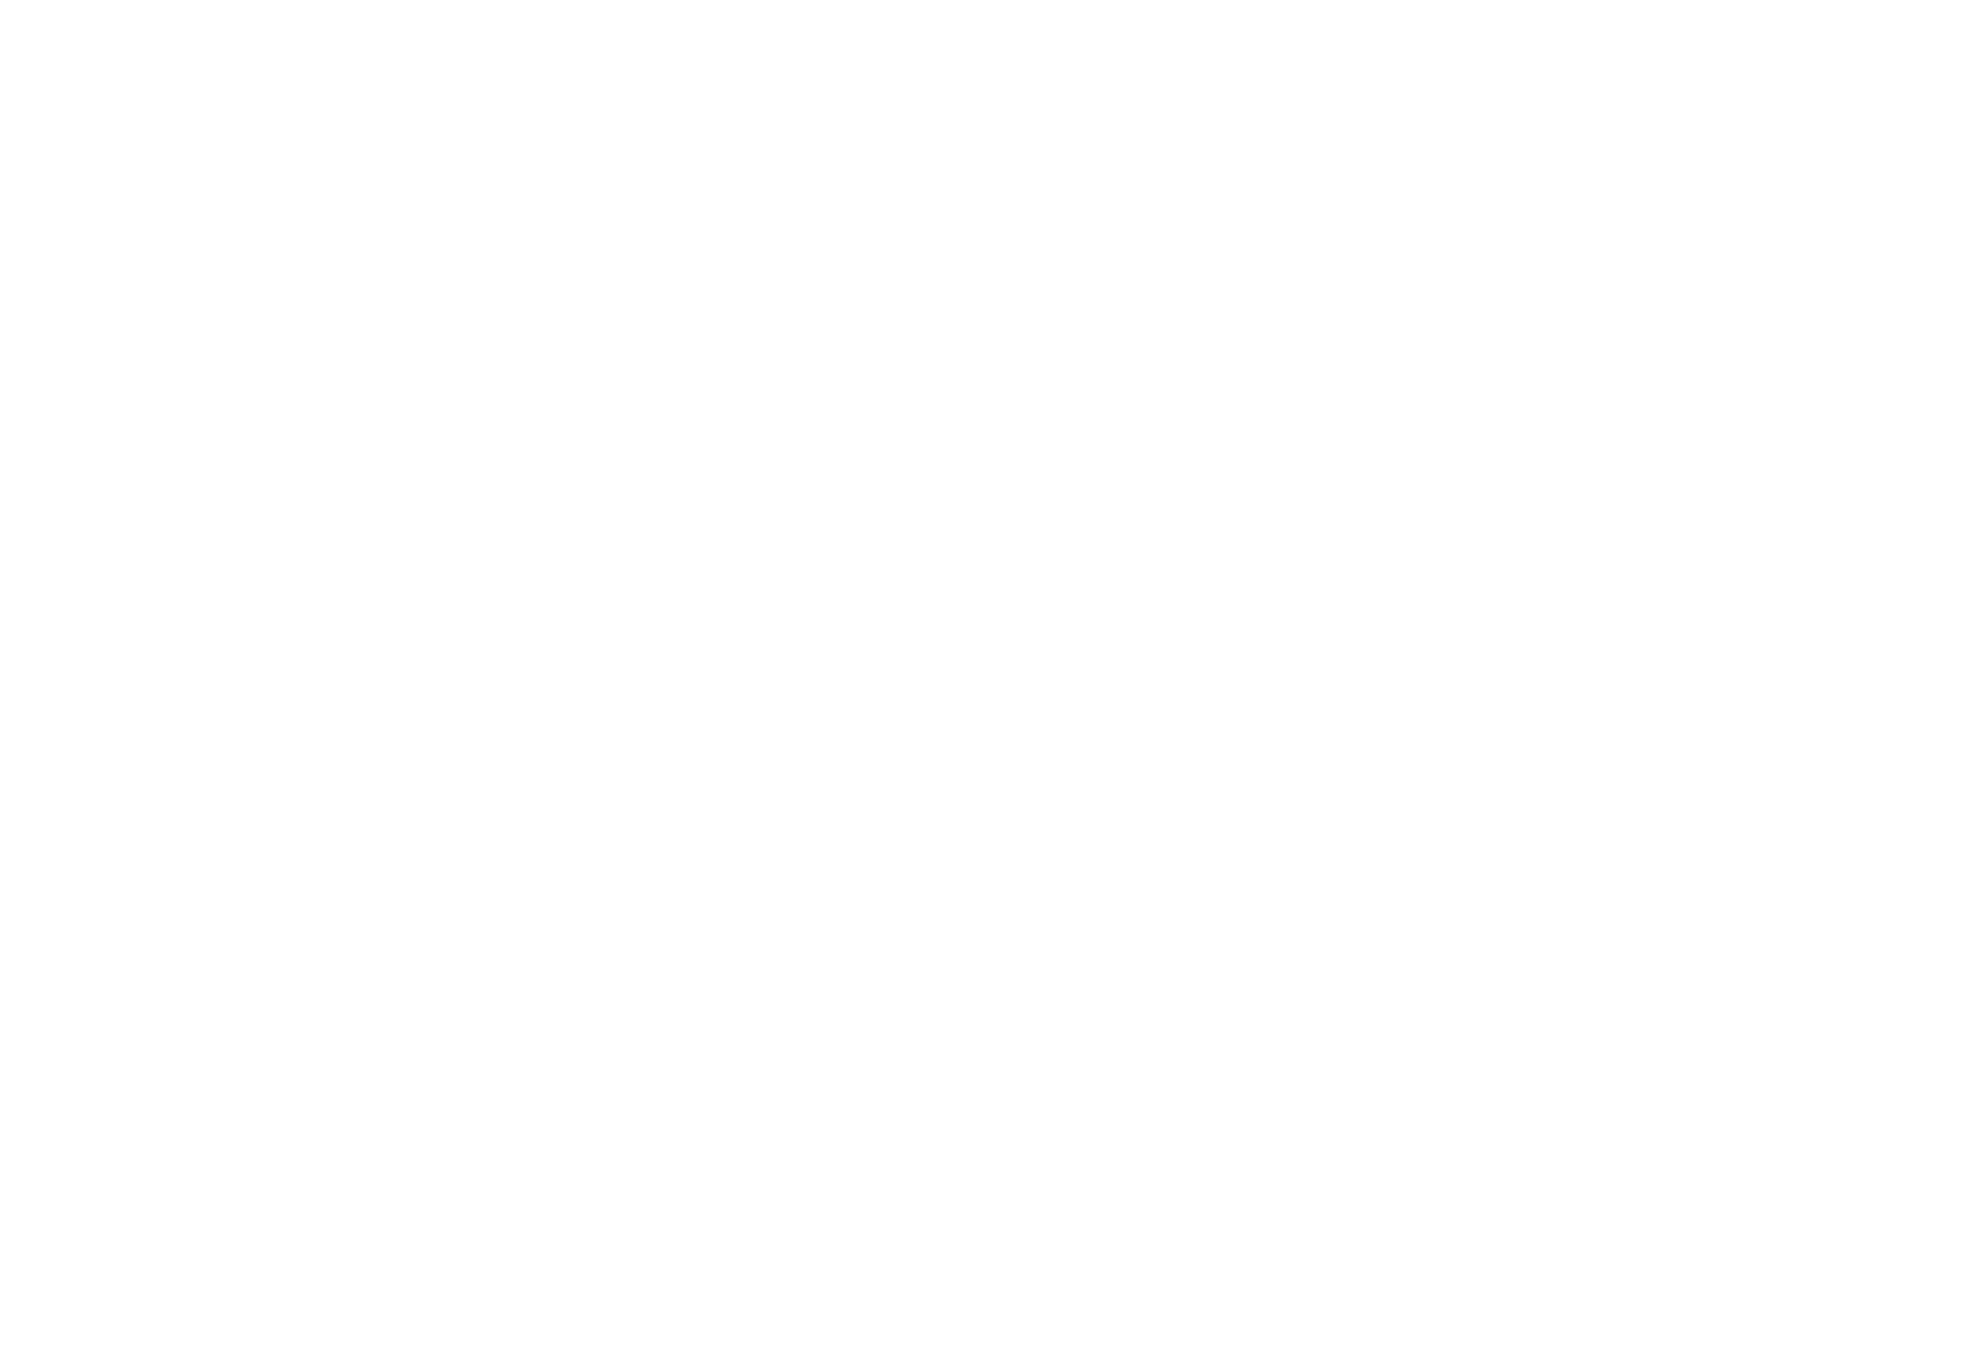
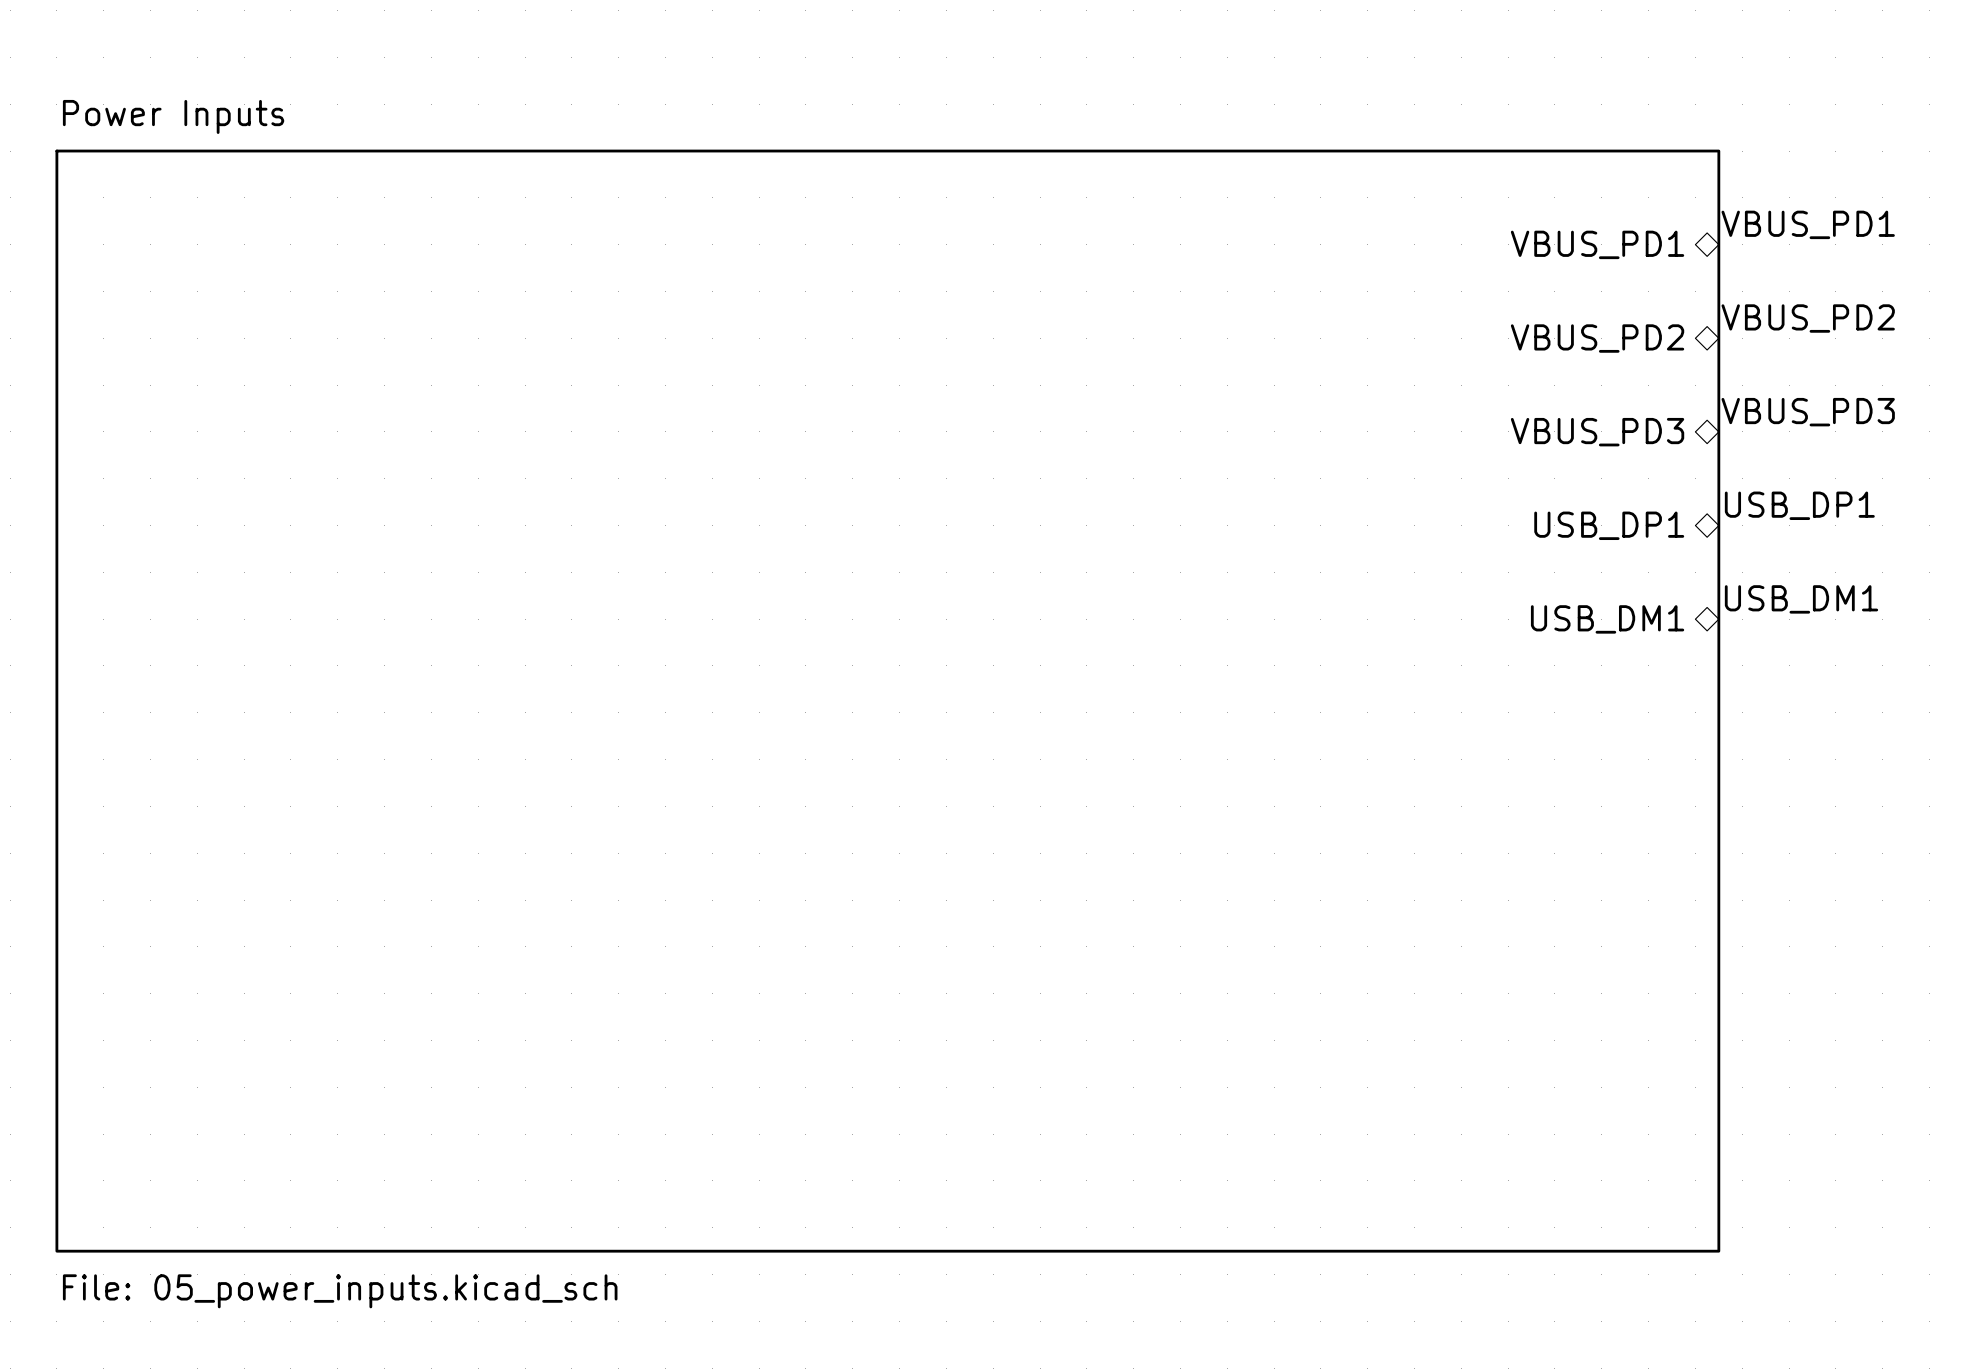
label: none -> VBUS_PD1 (1808, 224)
sheet pin: none -> VBUS_PD1 (1597, 244)
label: none -> VBUS_PD2 (1808, 318)
sheet pin: none -> VBUS_PD2 (1597, 338)
label: none -> VBUS_PD3 (1808, 412)
sheet pin: none -> VBUS_PD3 (1597, 432)
label: none -> USB_DP1 (1799, 505)
sheet pin: none -> USB_DP1 (1609, 525)
label: none -> USB_DM1 (1801, 599)
sheet pin: none -> USB_DM1 (1607, 619)
sheet Power Inputs: none -> File: 05_power_inputs.kicad_sch (887, 701)

